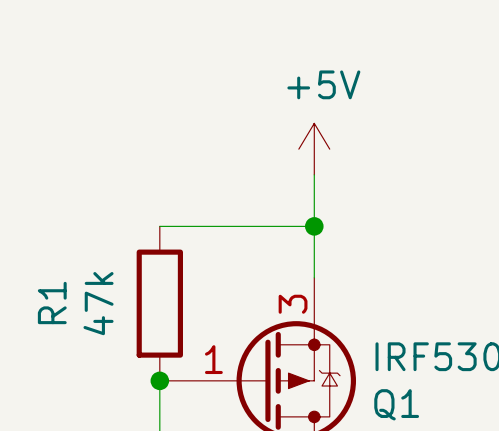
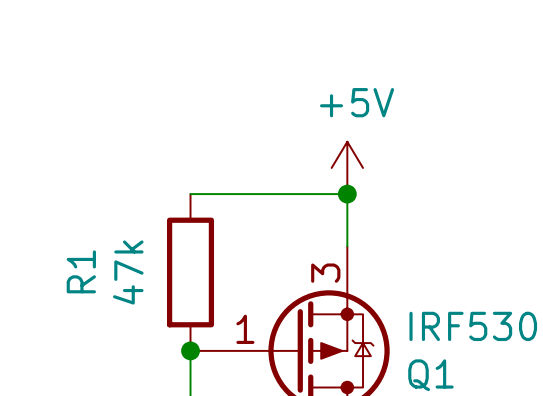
power symbol position: +5V (314, 149) -> +5V (347, 167)

